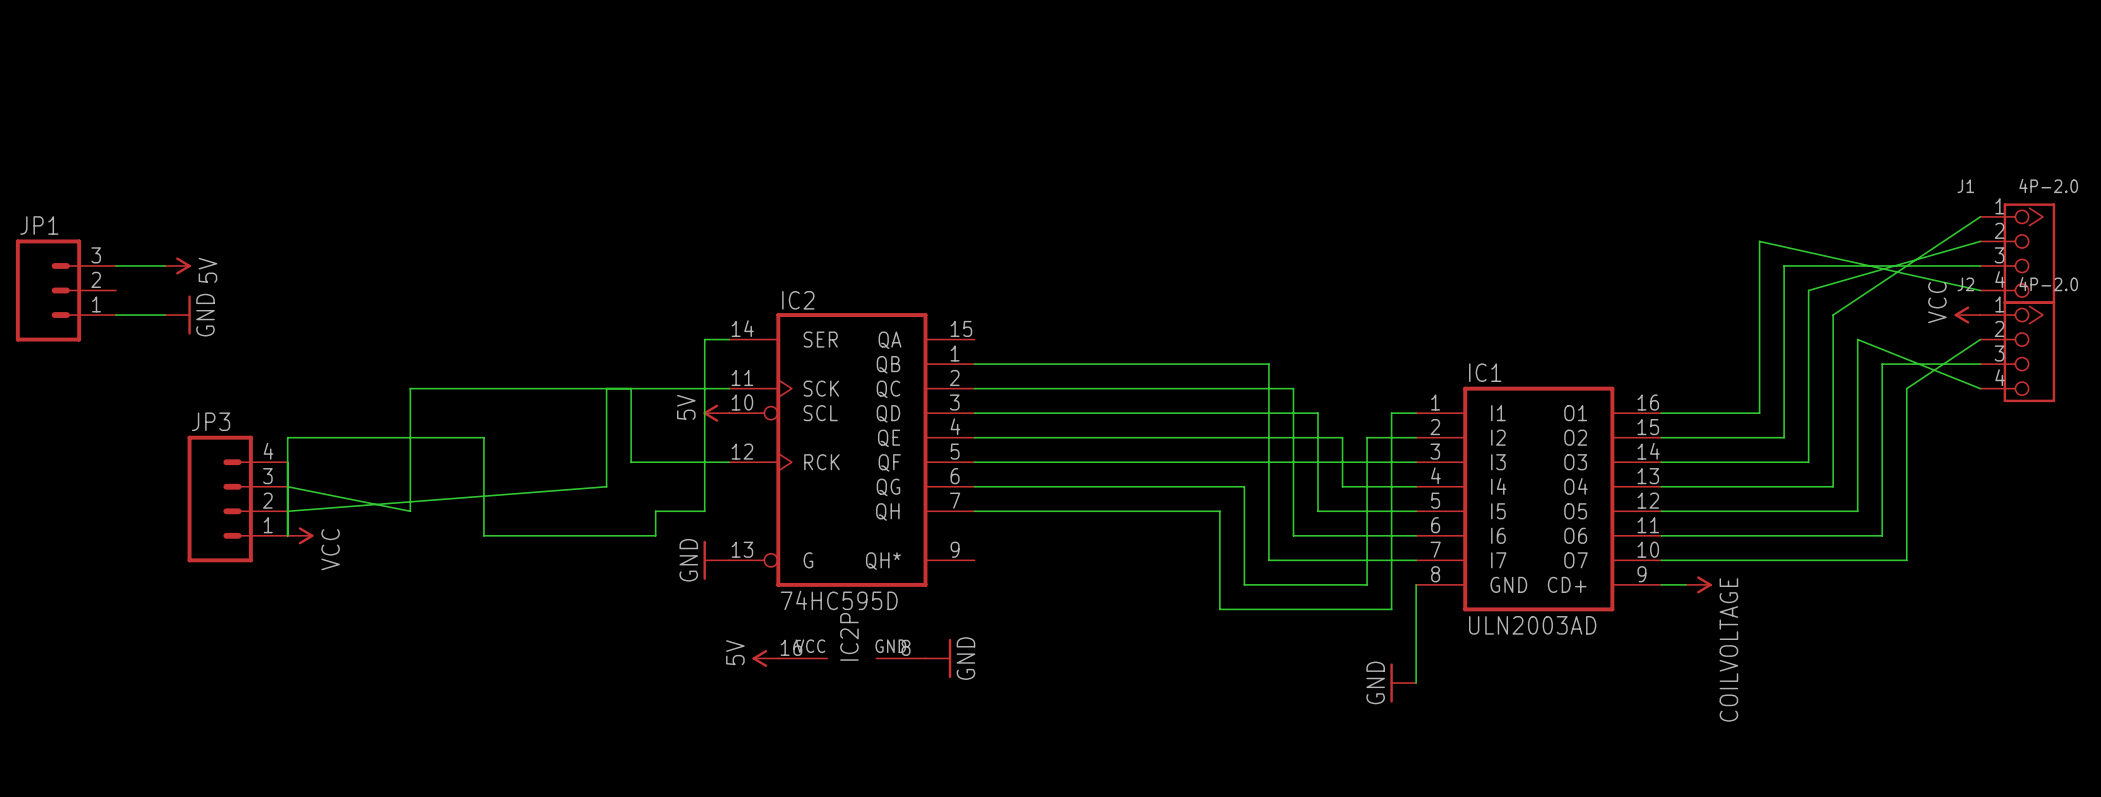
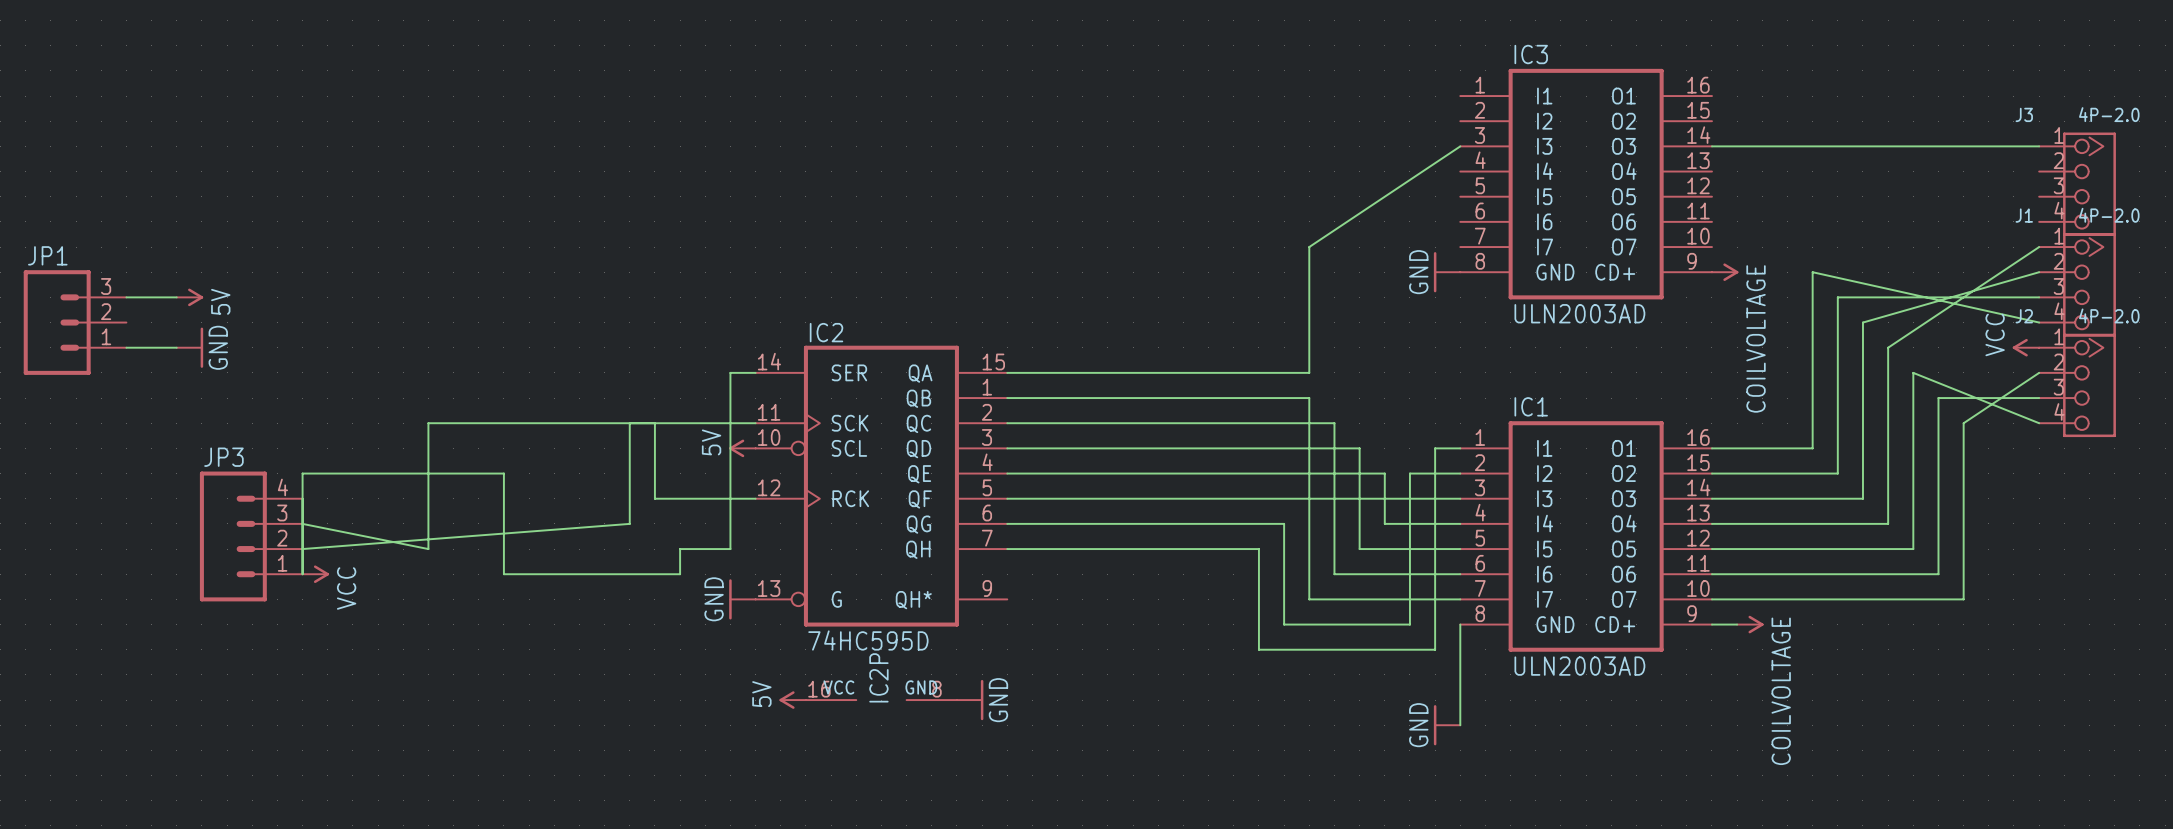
wire: none -> (1460, 146) (1309, 247) (1309, 372) (1007, 372)
wire: none -> (1711, 146) (2039, 146)
IC3: none -> ULN2003AD (1586, 184)
J3: none -> 4P-2.0 (2077, 184)
power symbol: none -> GND (1447, 272)
power symbol: none -> COILVOLTAGE (1725, 272)

